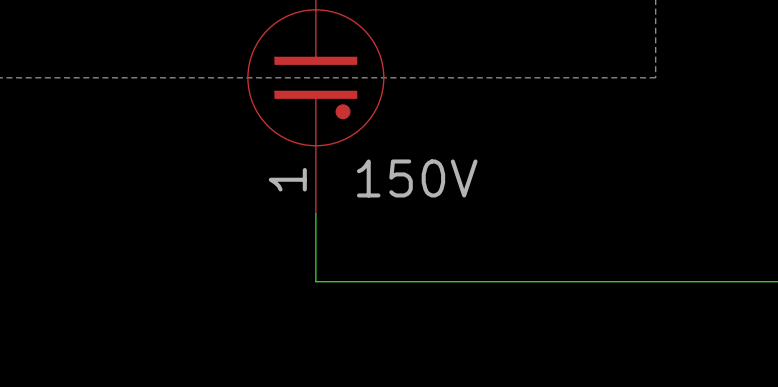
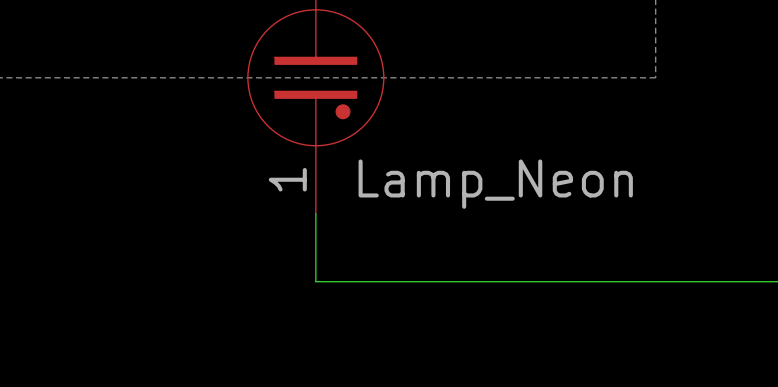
part value: 150V (417, 178) -> Lamp_Neon (495, 184)

